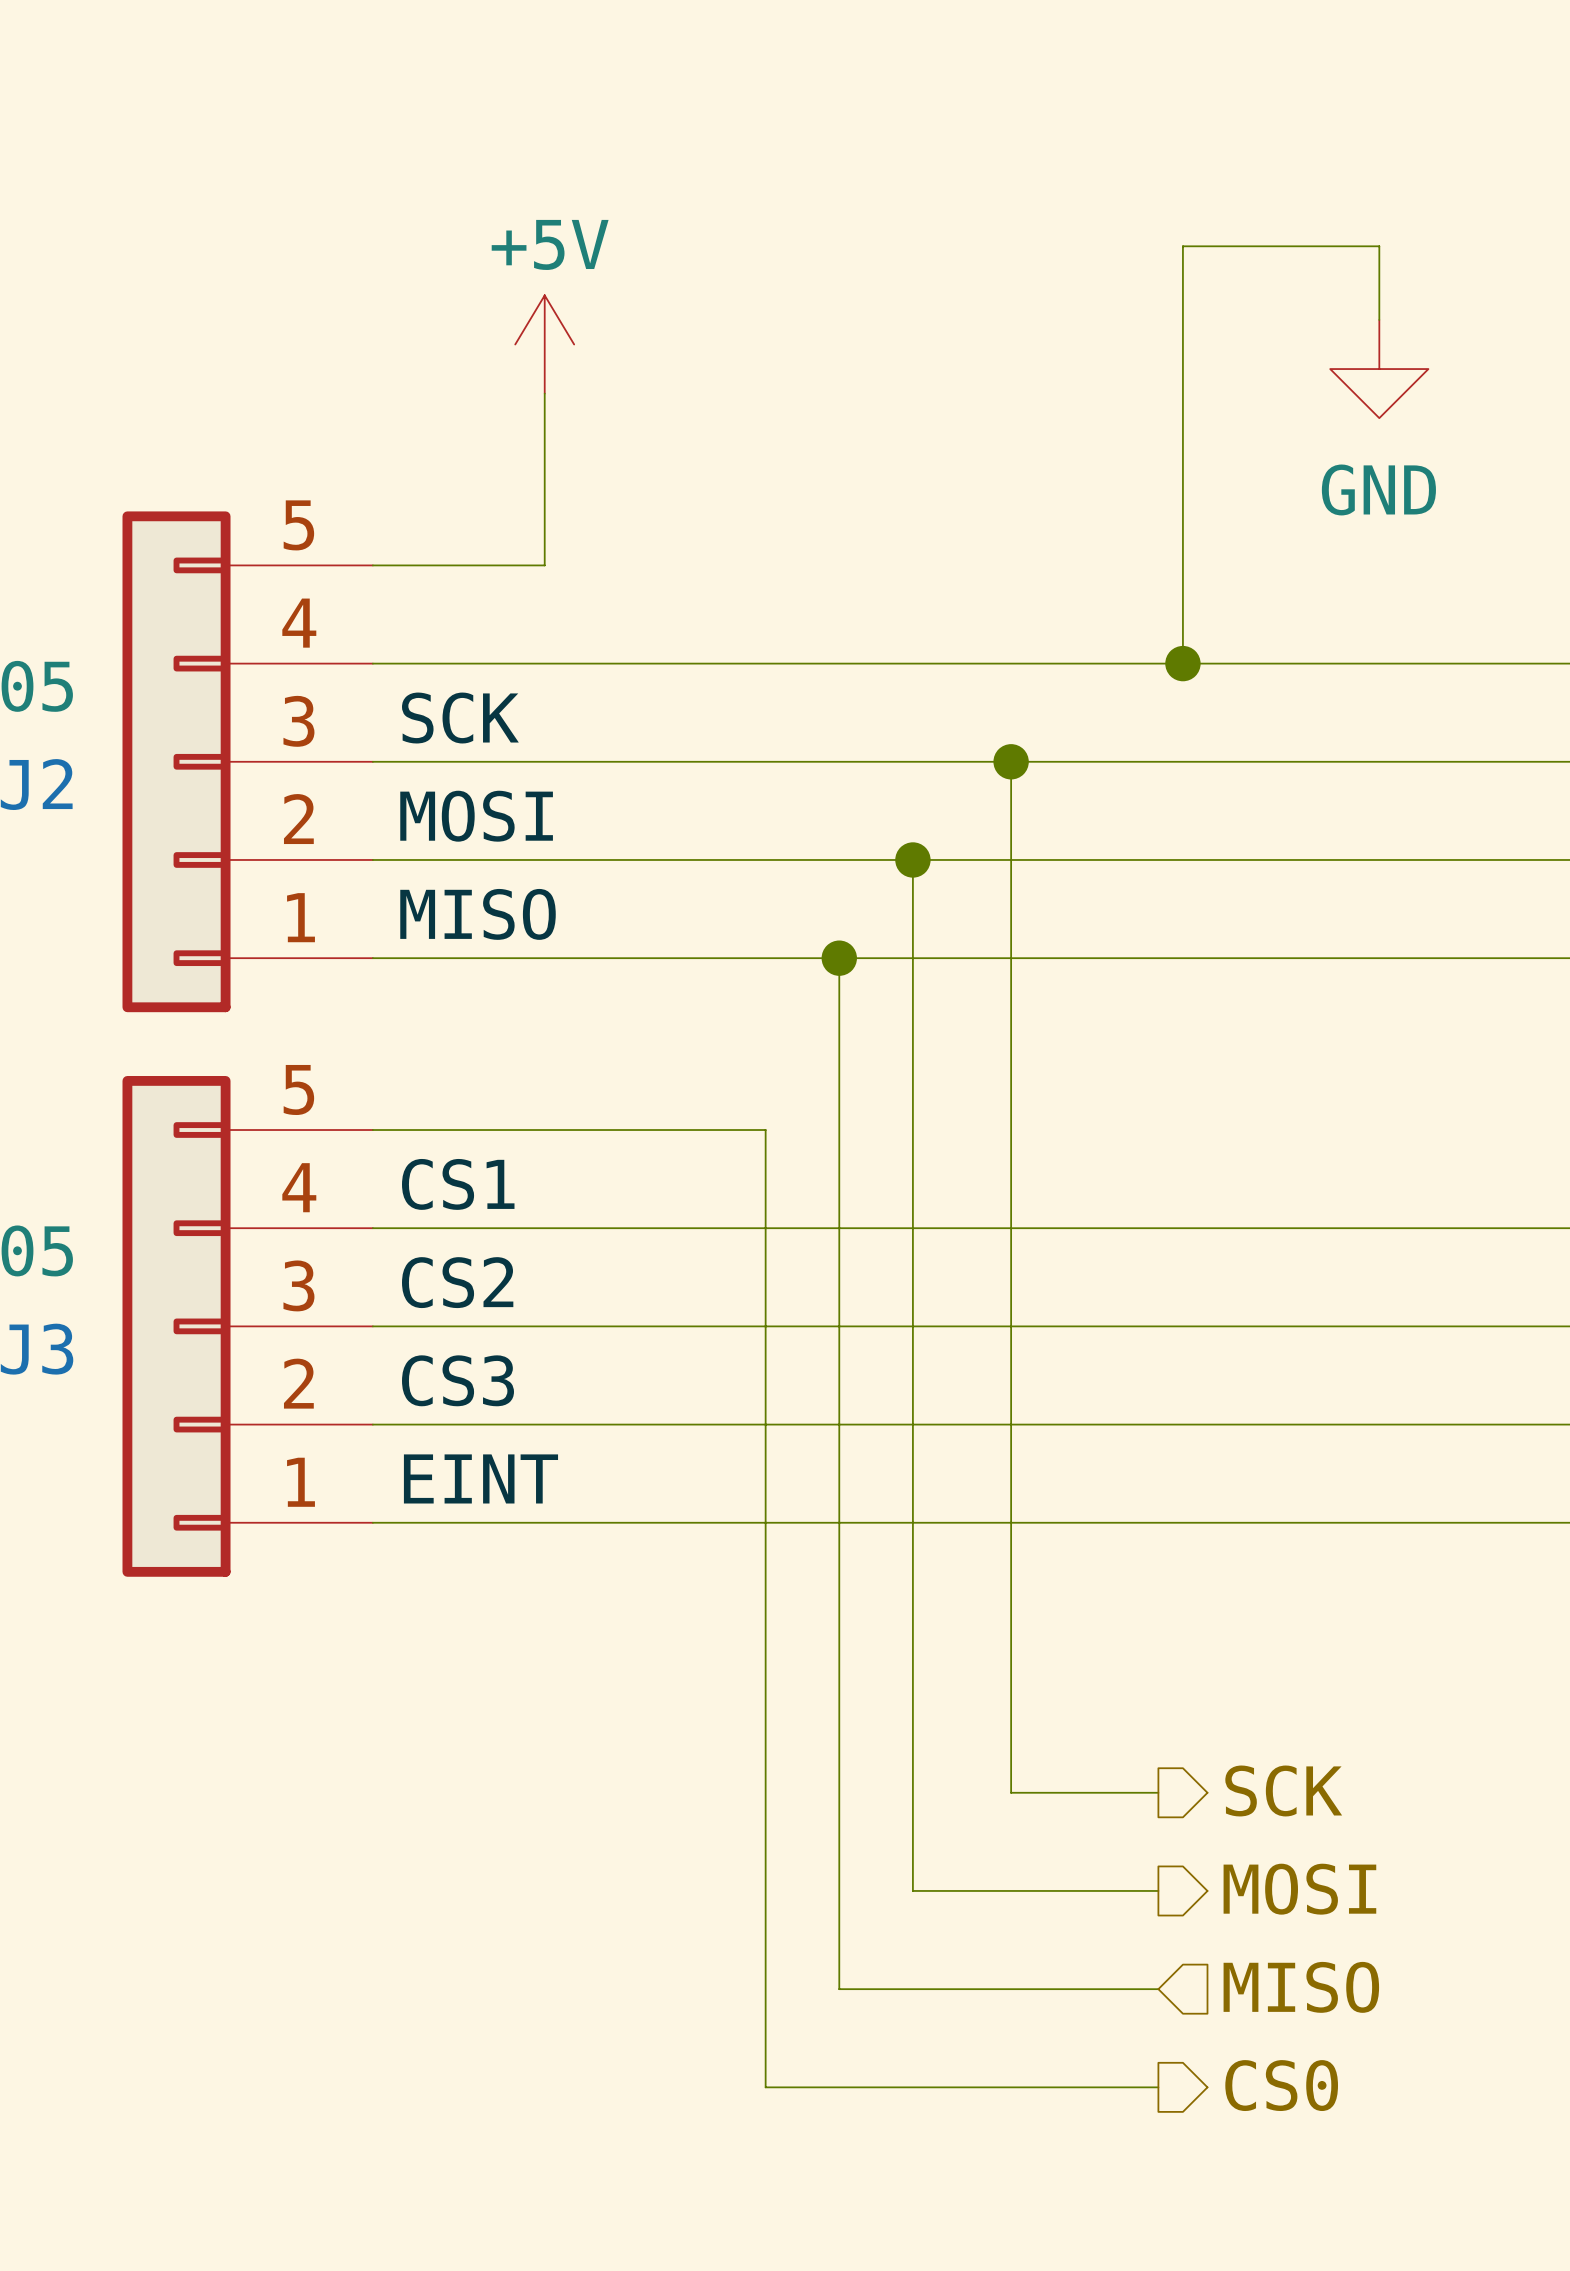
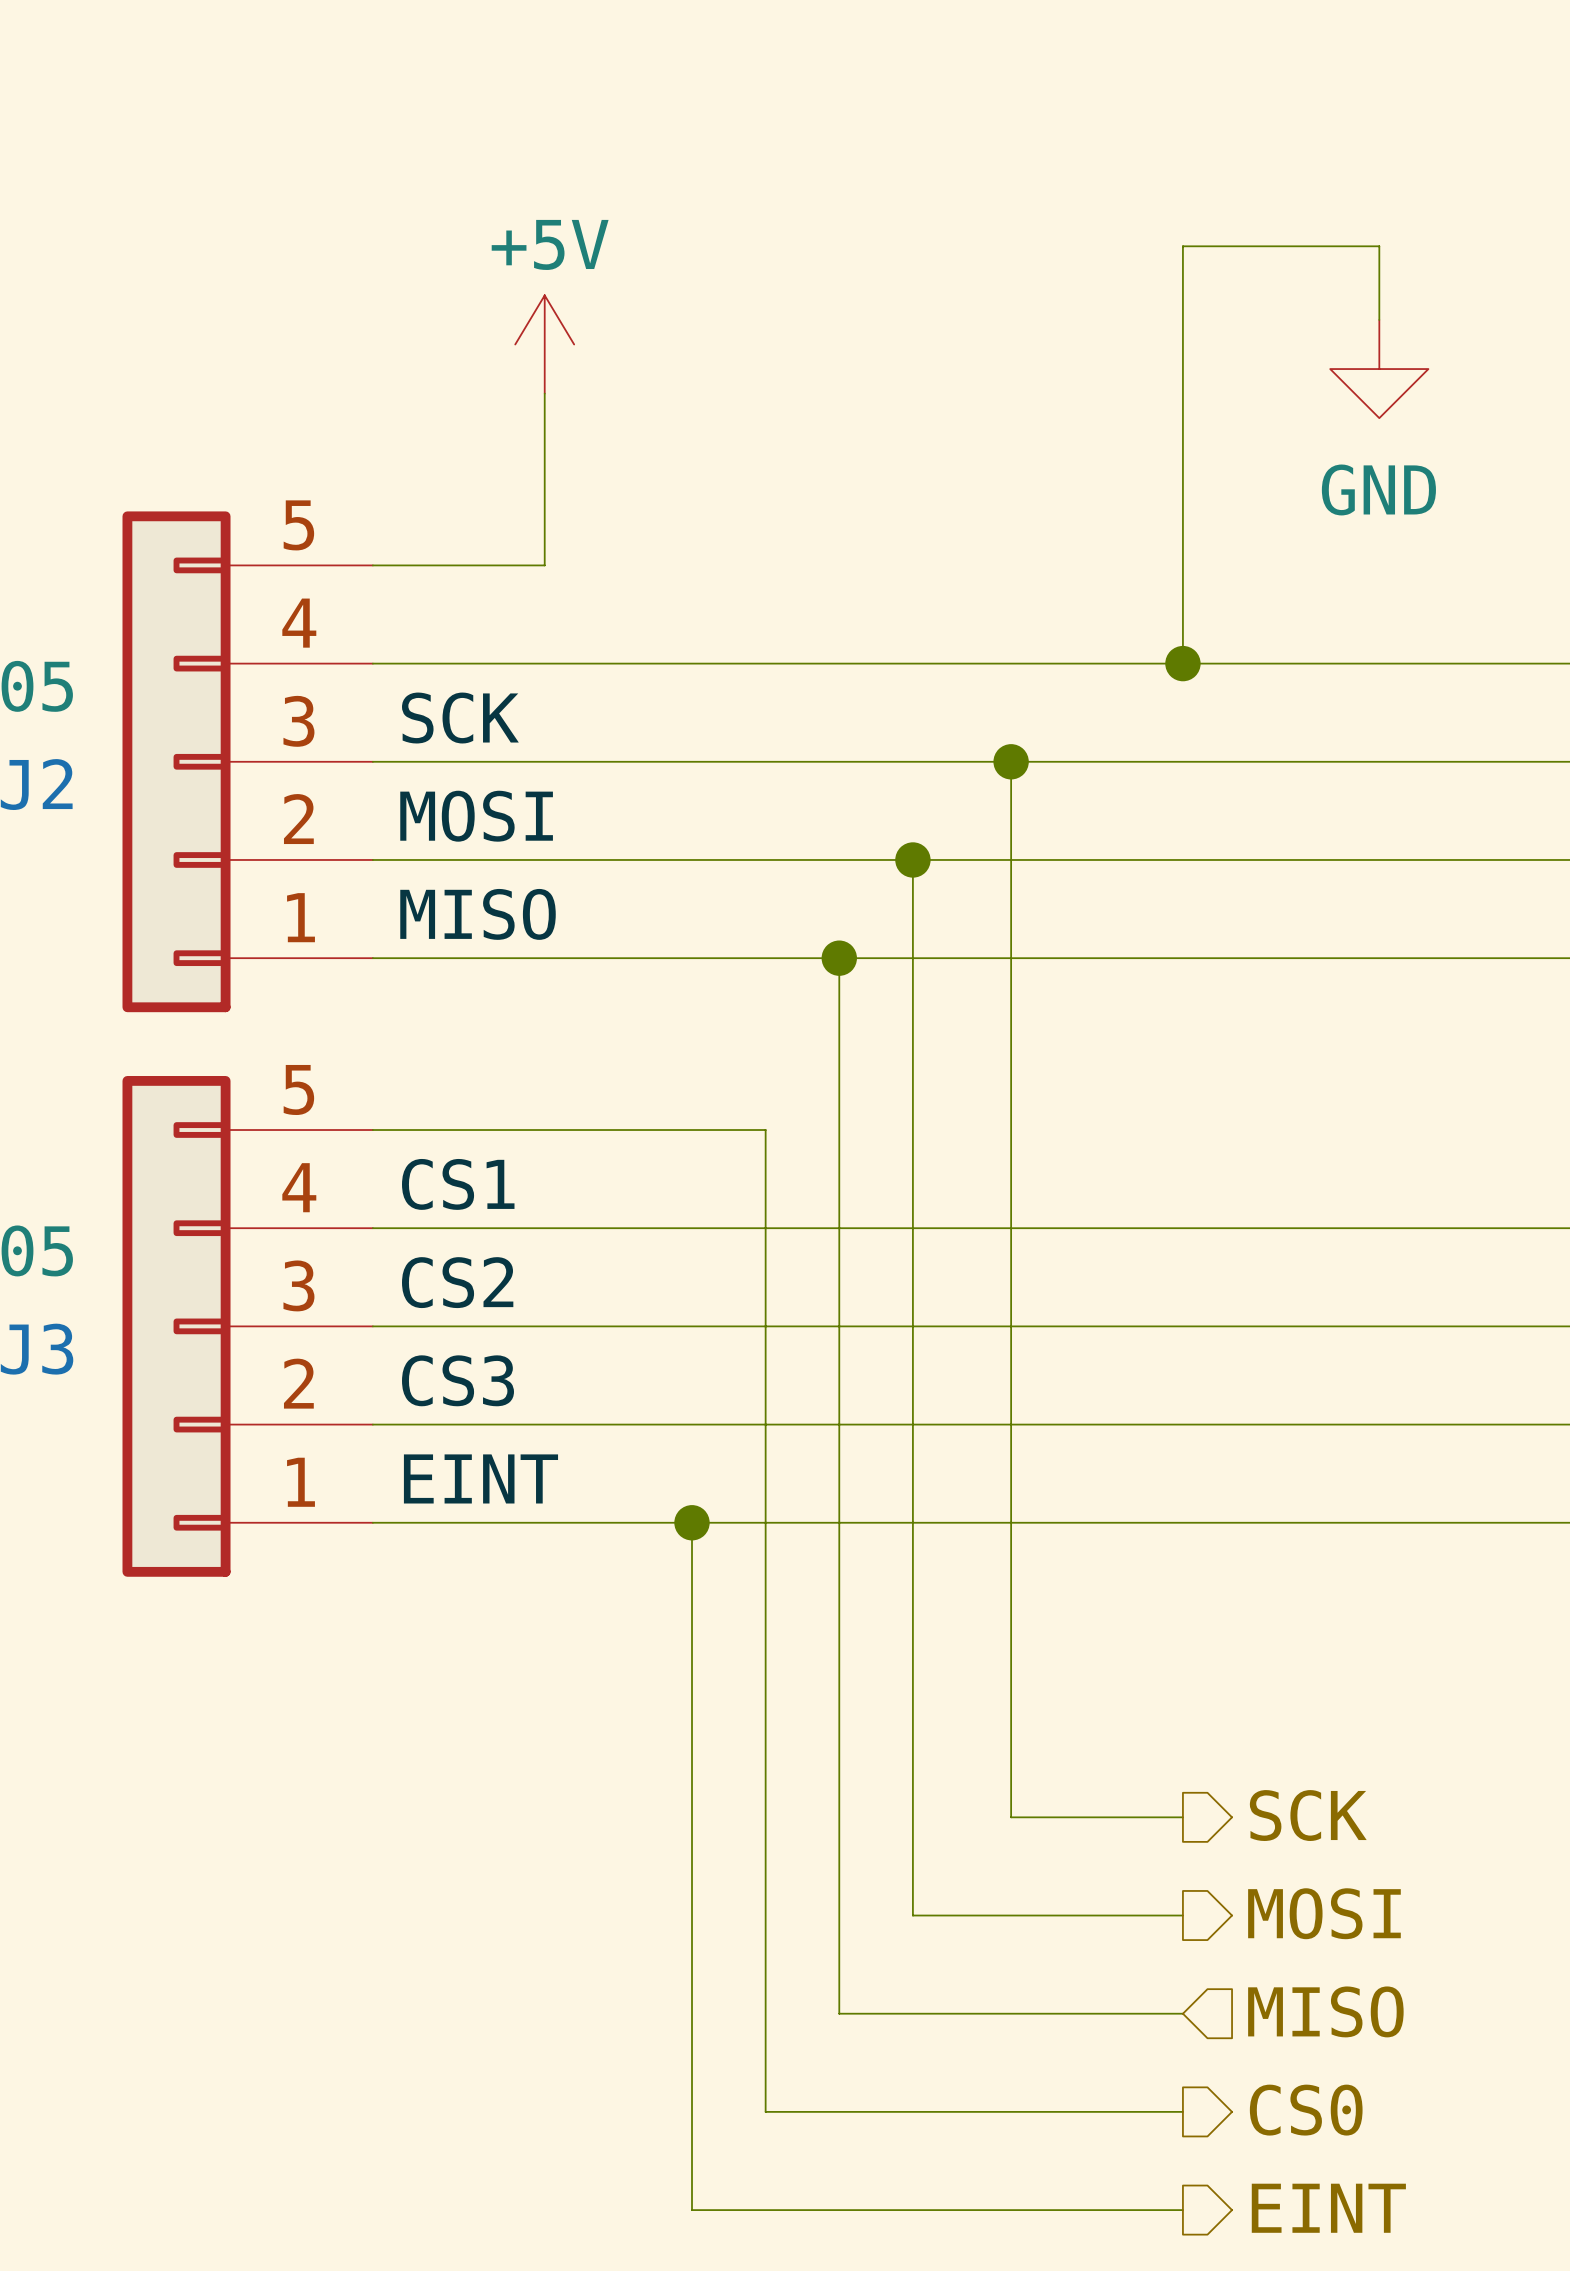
wire: none -> (692, 1522) (692, 2210) (1182, 2210)
junction: none -> (692, 1522)
hierarchical label position: SCK (1283, 1790) -> SCK (1308, 1815)
wire: (1011, 1792) (1158, 1792) -> (1011, 1792) (1011, 1817) (1182, 1817)
hierarchical label position: MOSI (1299, 1889) -> MOSI (1324, 1913)
wire: (912, 1890) (1158, 1890) -> (912, 1890) (912, 1915) (1182, 1915)
hierarchical label position: MISO (1301, 1987) -> MISO (1325, 2011)
wire: (839, 1989) (1158, 1989) -> (839, 1989) (839, 2013) (1182, 2013)
hierarchical label position: CS0 (1281, 2085) -> CS0 (1306, 2110)
wire: (765, 2087) (1158, 2087) -> (765, 2087) (765, 2111) (1182, 2111)
hierarchical label: none -> EINT (1328, 2208)

